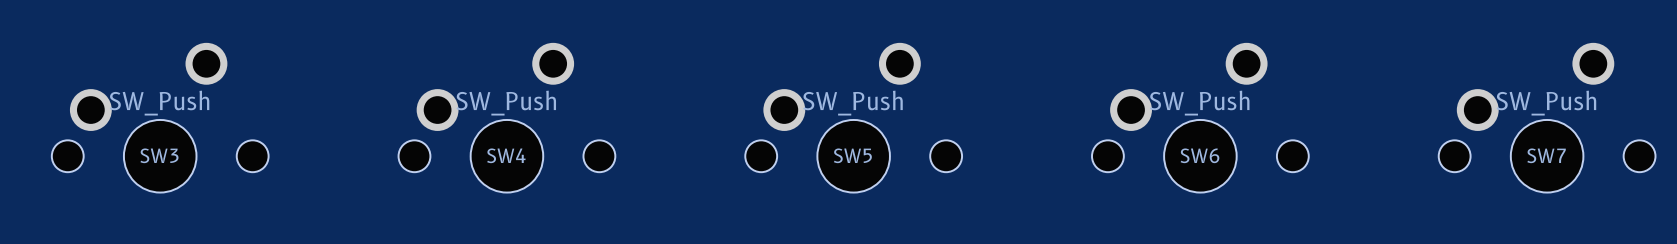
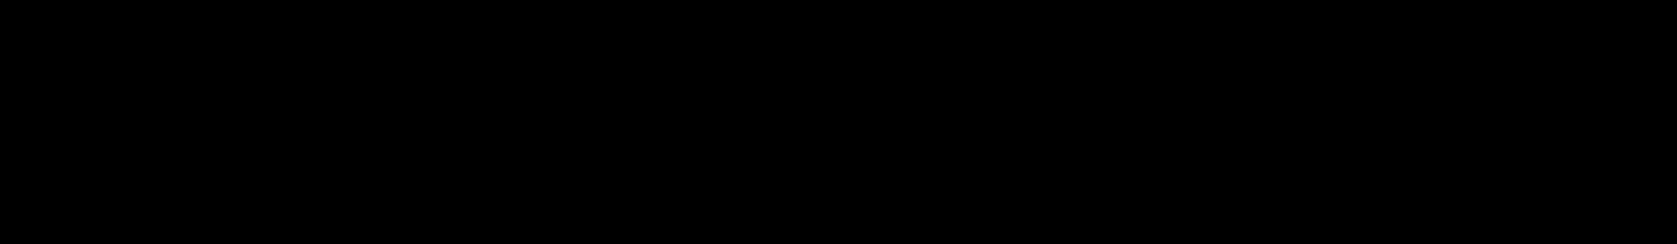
SW3: SW_Push (160, 117) -> none
SW4: SW_Push (506, 117) -> none
SW5: SW_Push (853, 117) -> none
SW6: SW_Push (1200, 117) -> none
SW7: SW_Push (1547, 117) -> none

